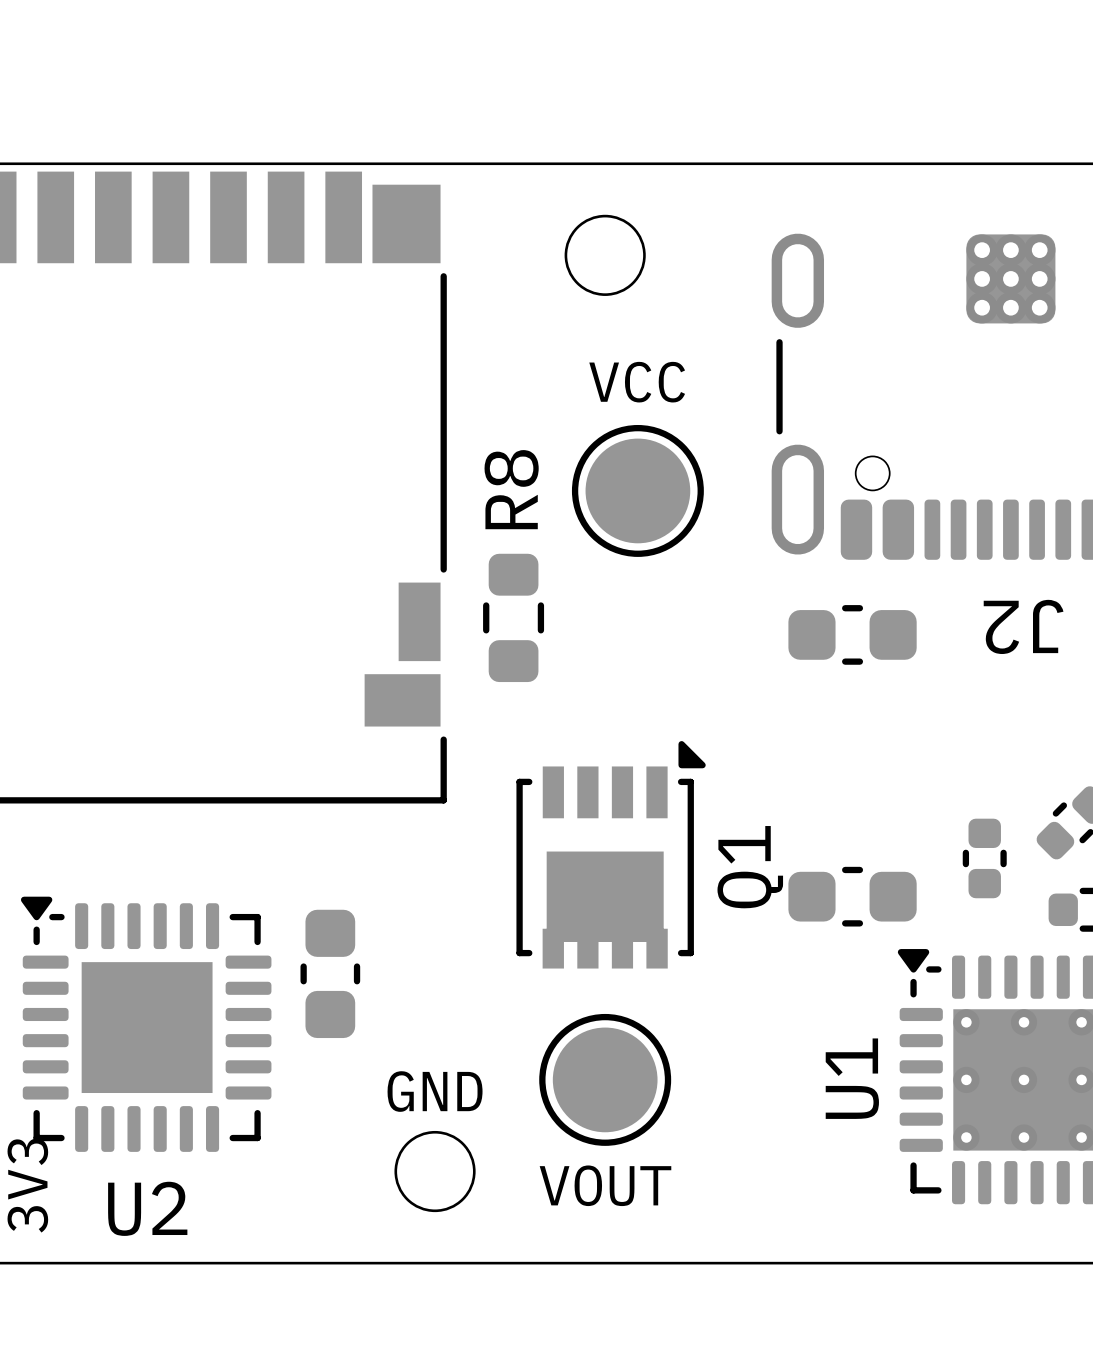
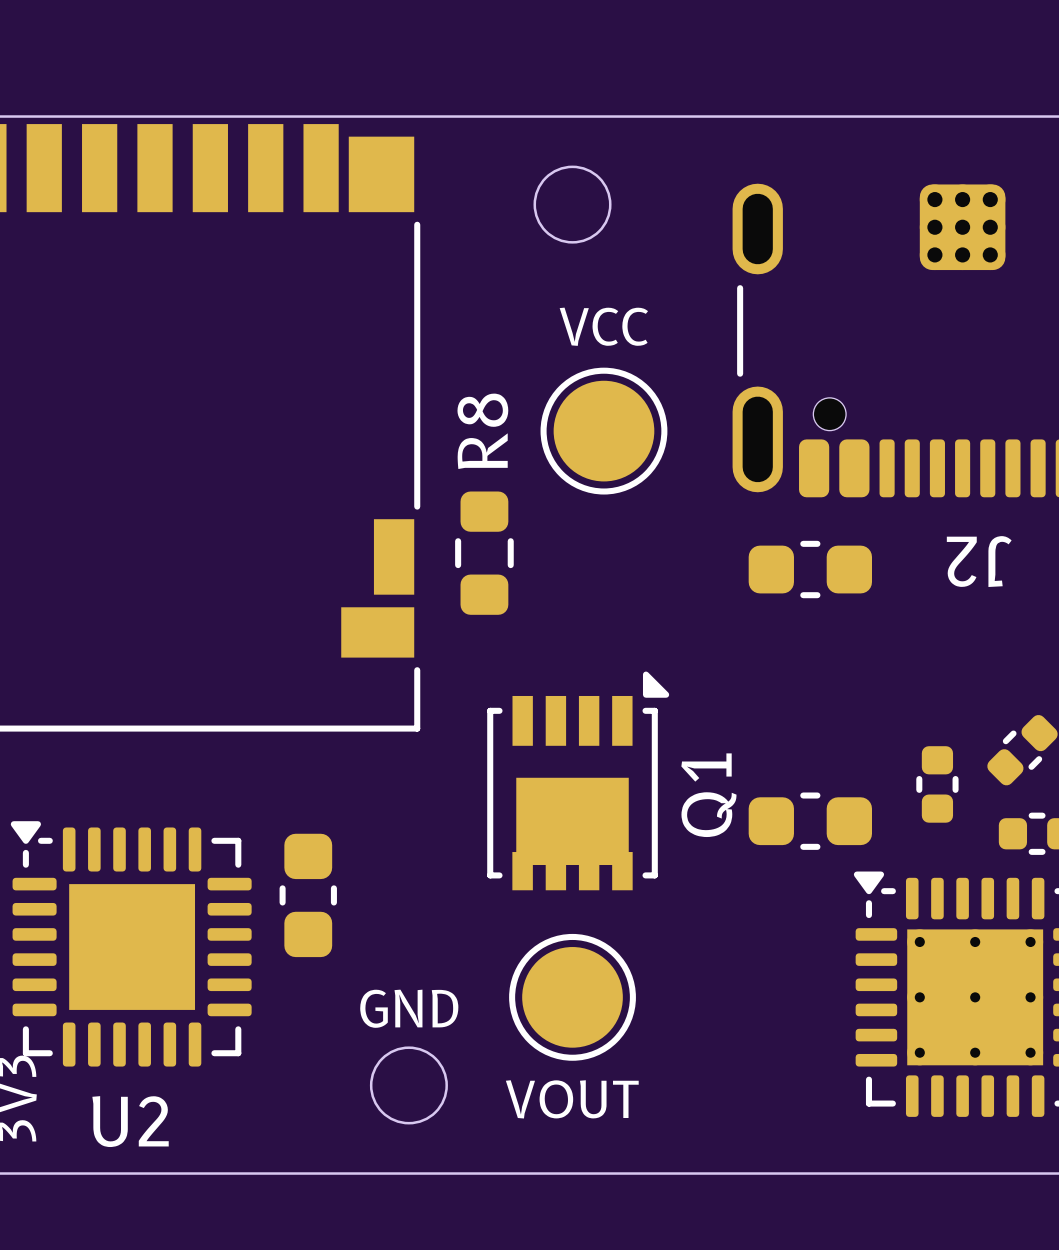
U1 name: U1 (852, 1078) -> none

